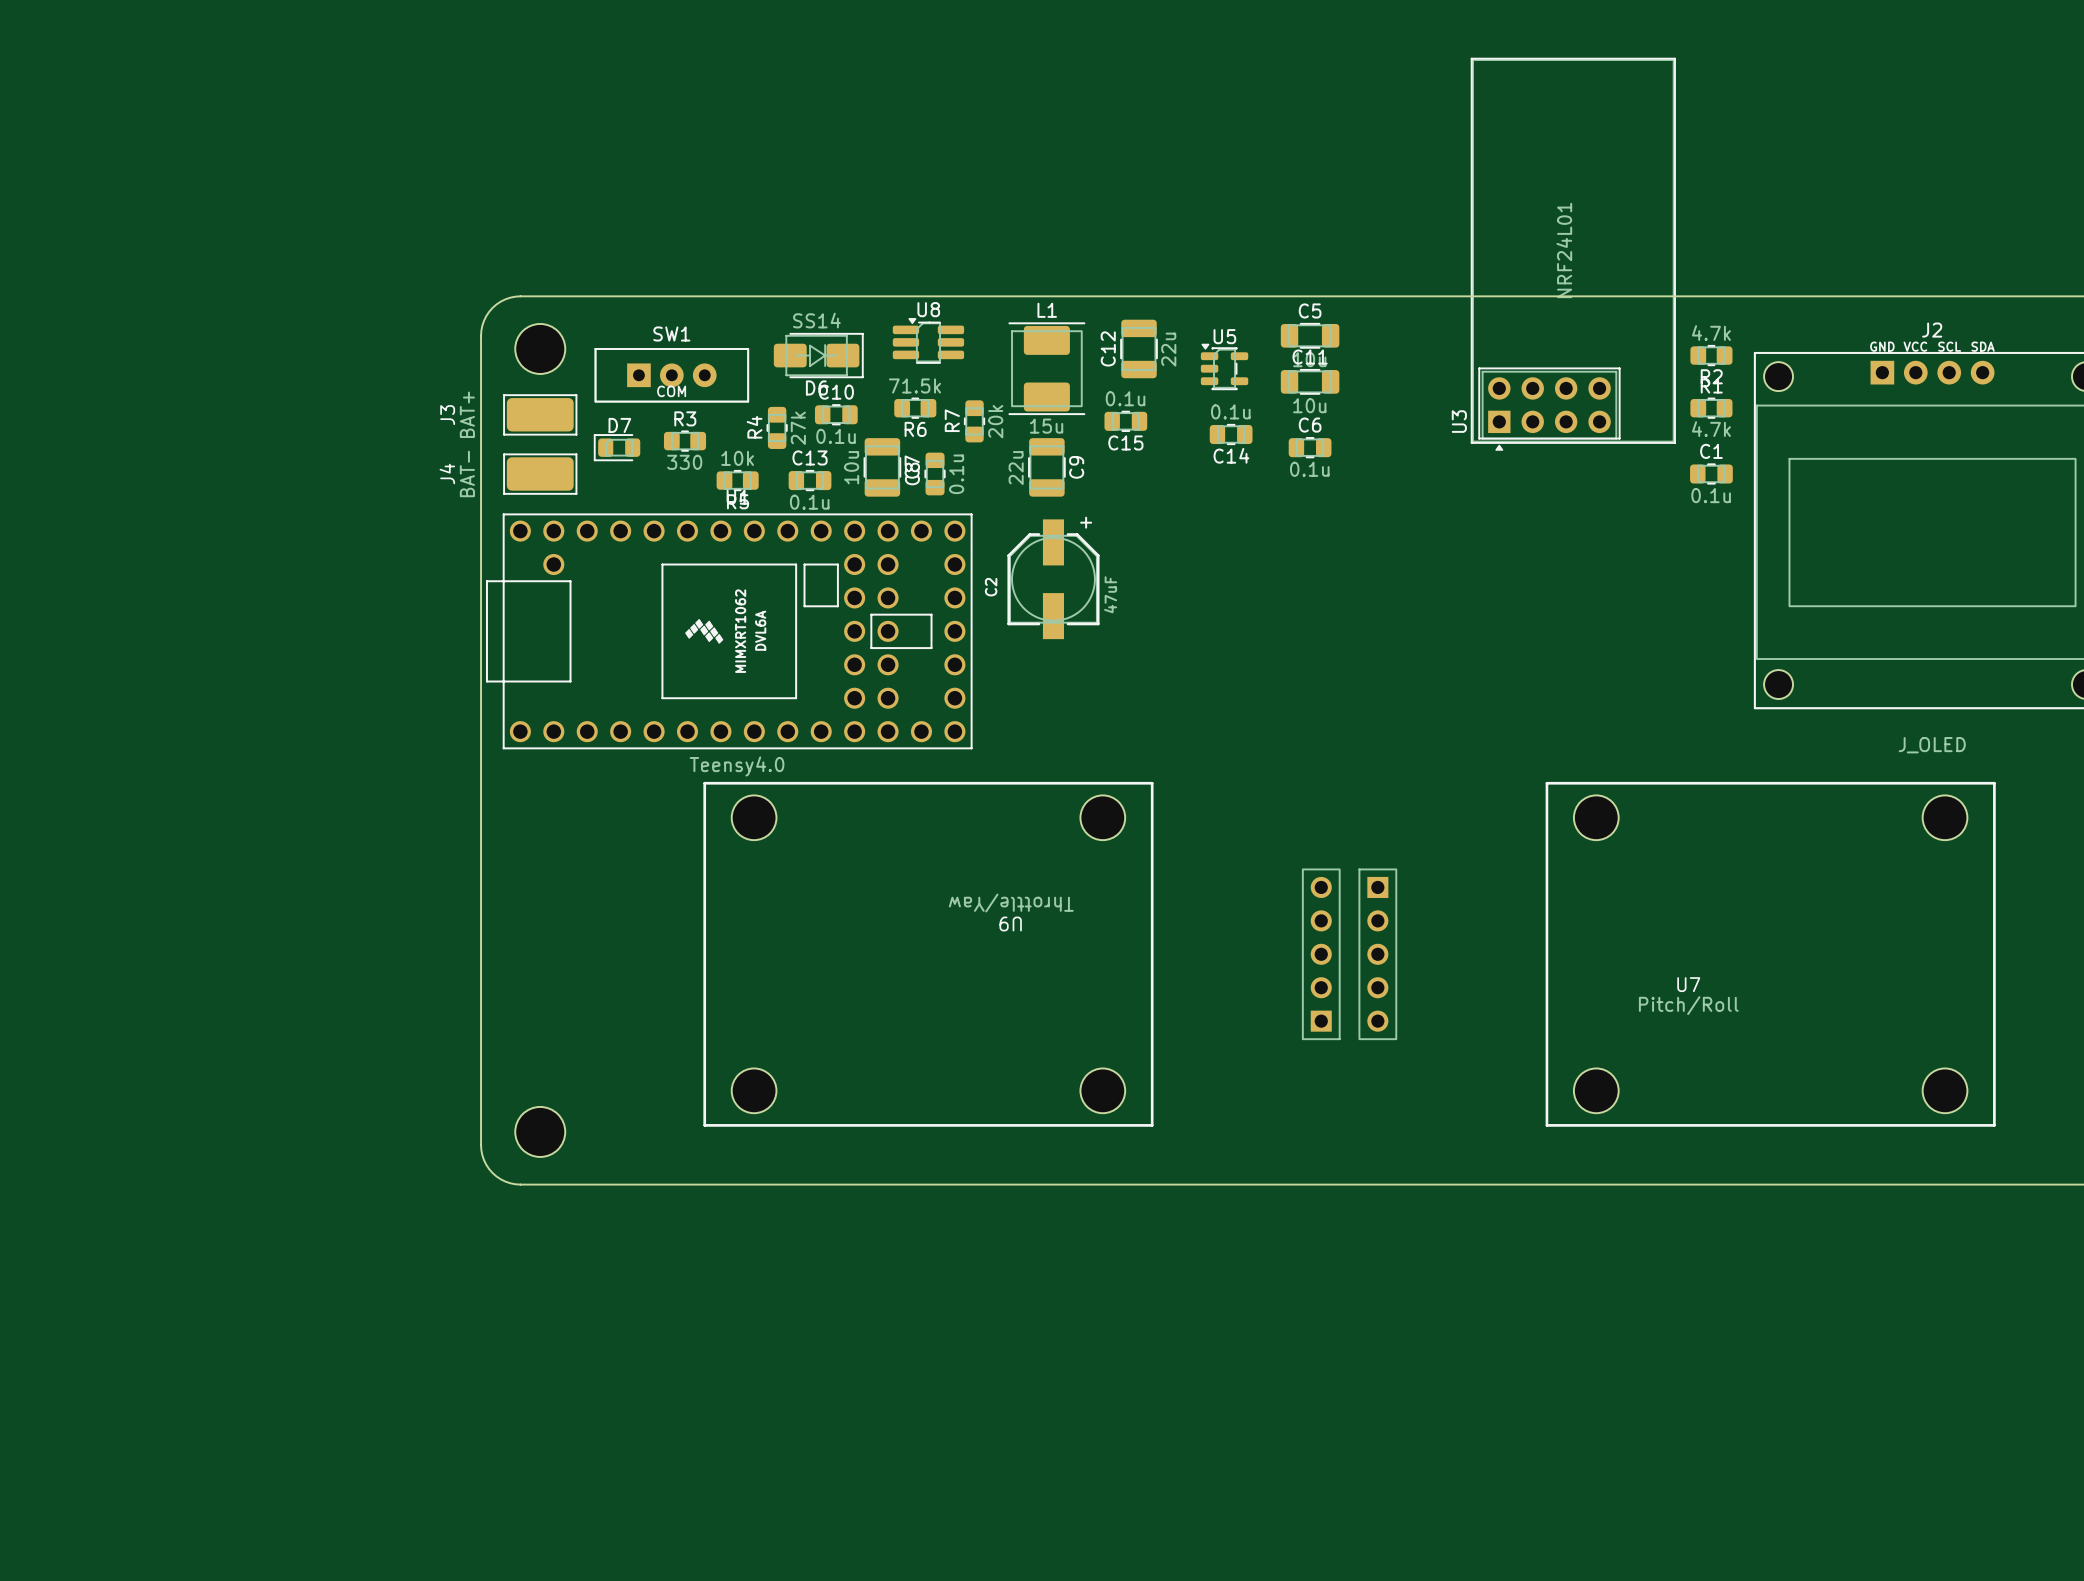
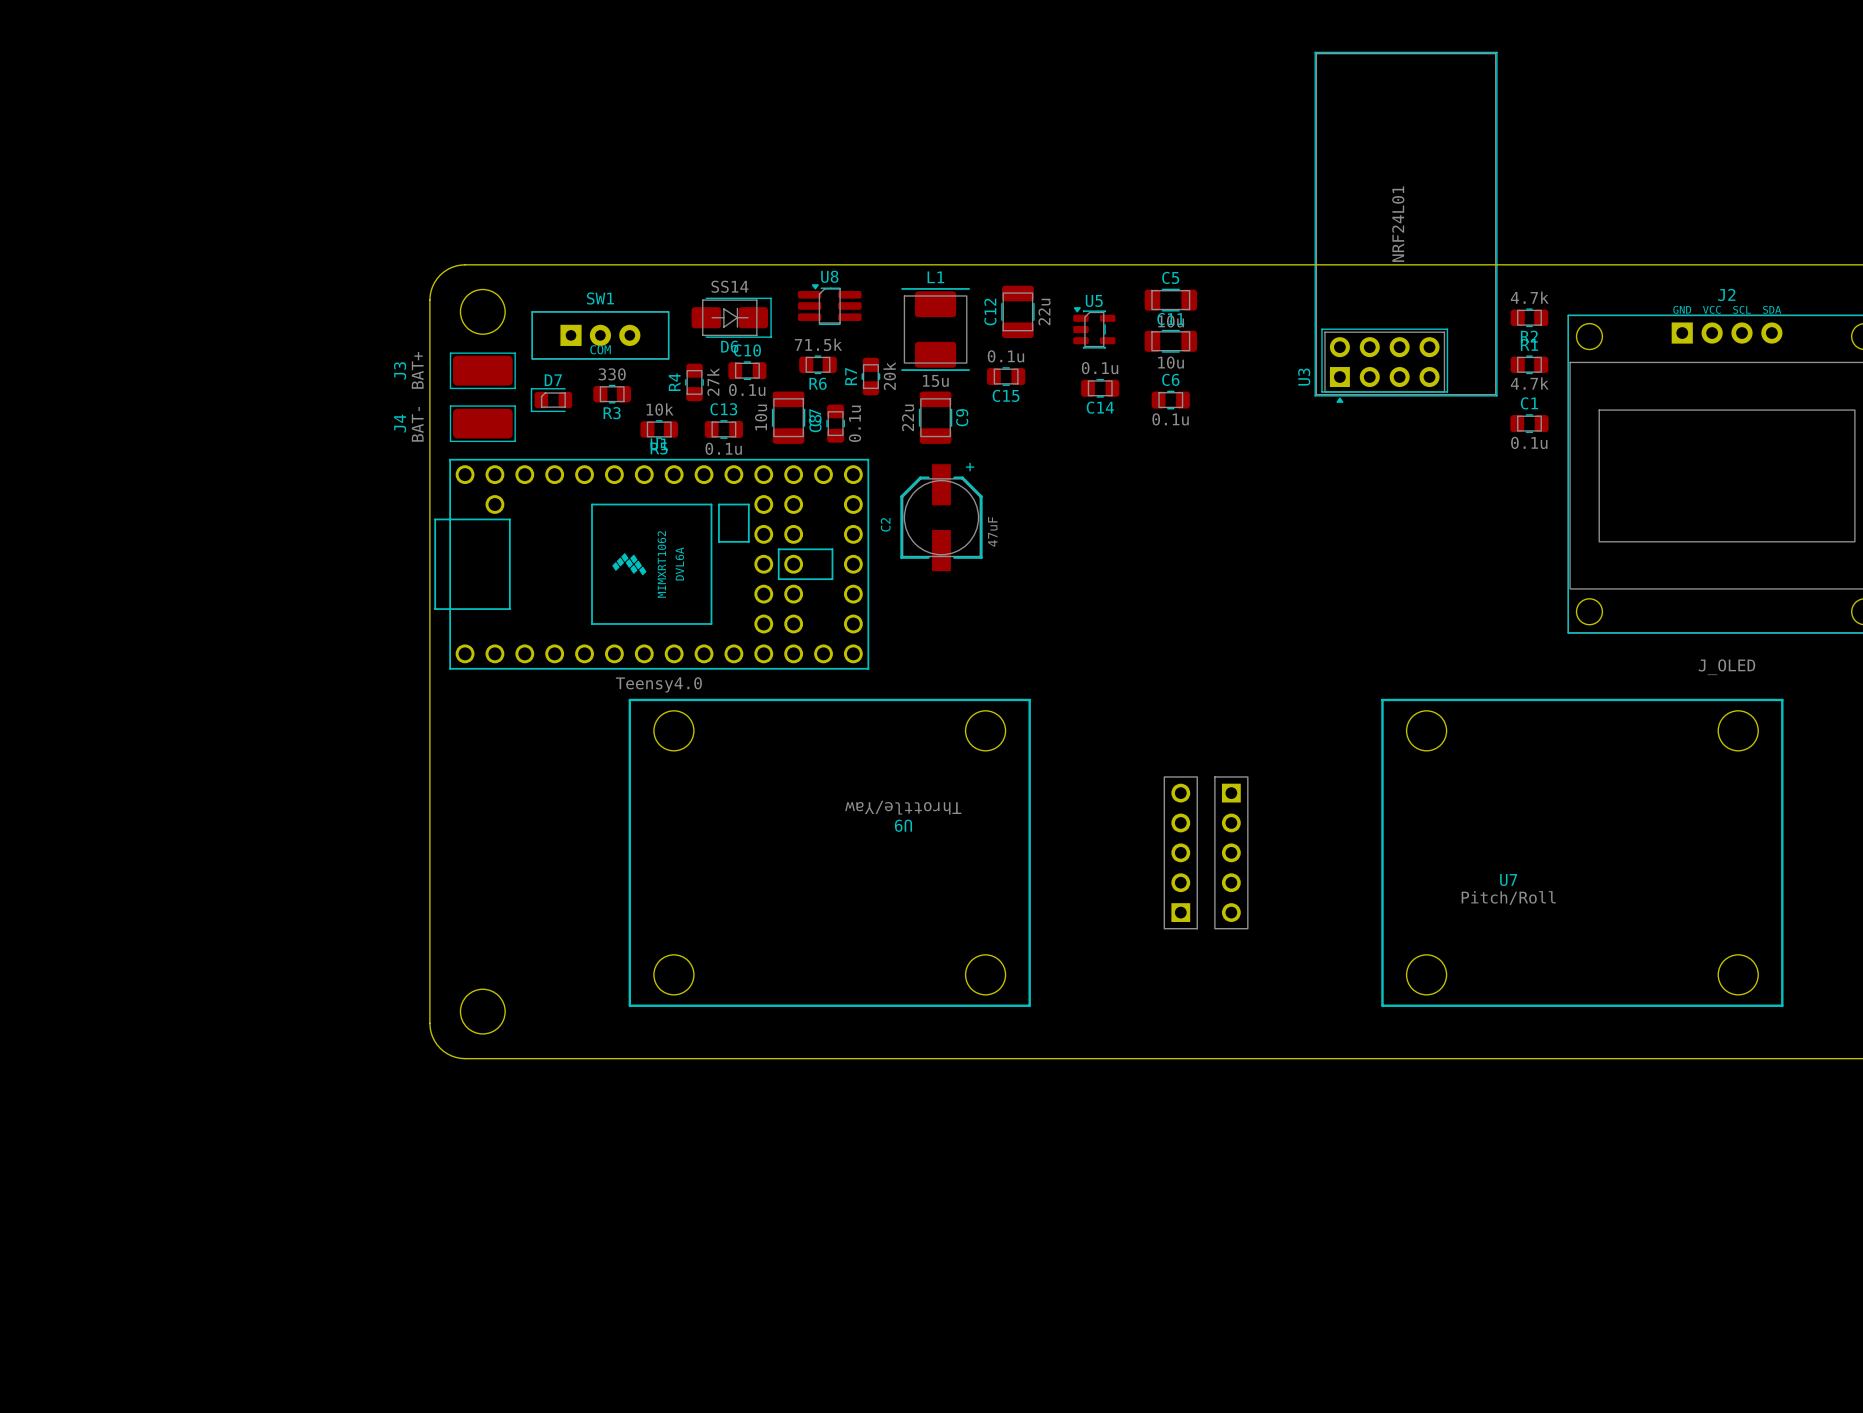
R3 name position: R3 (685, 418) -> R3 (612, 413)
R3 value position: 330 (684, 462) -> 330 (612, 374)

